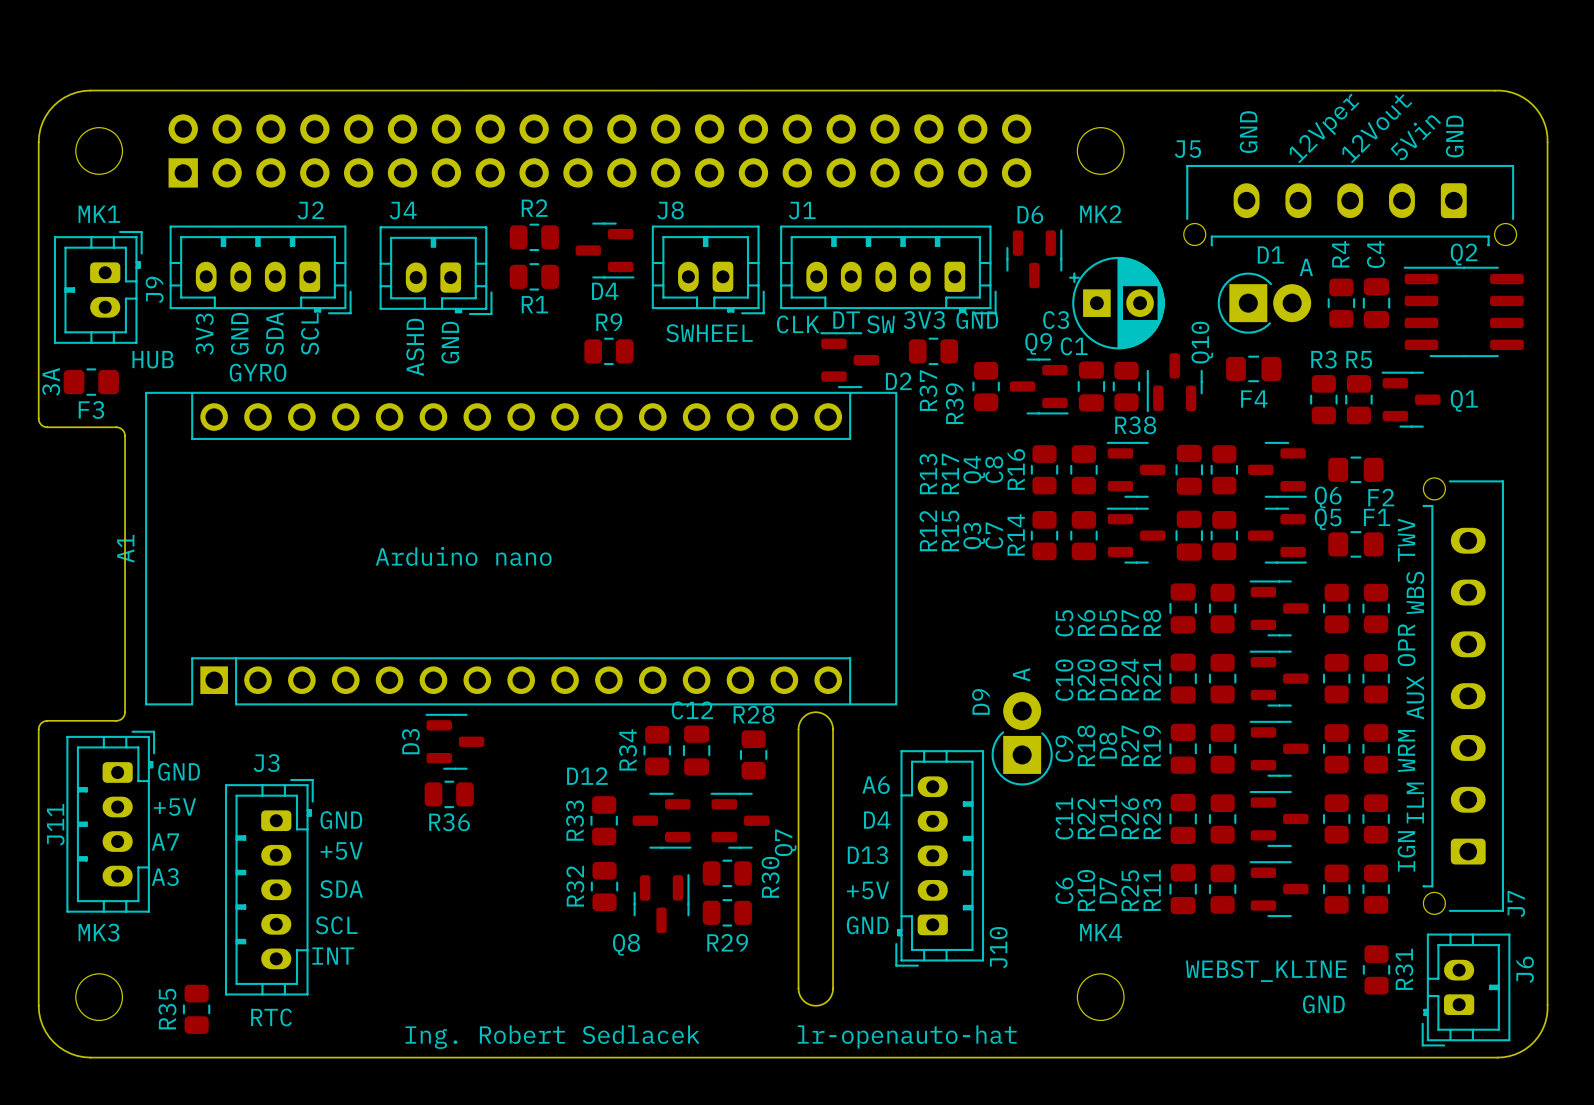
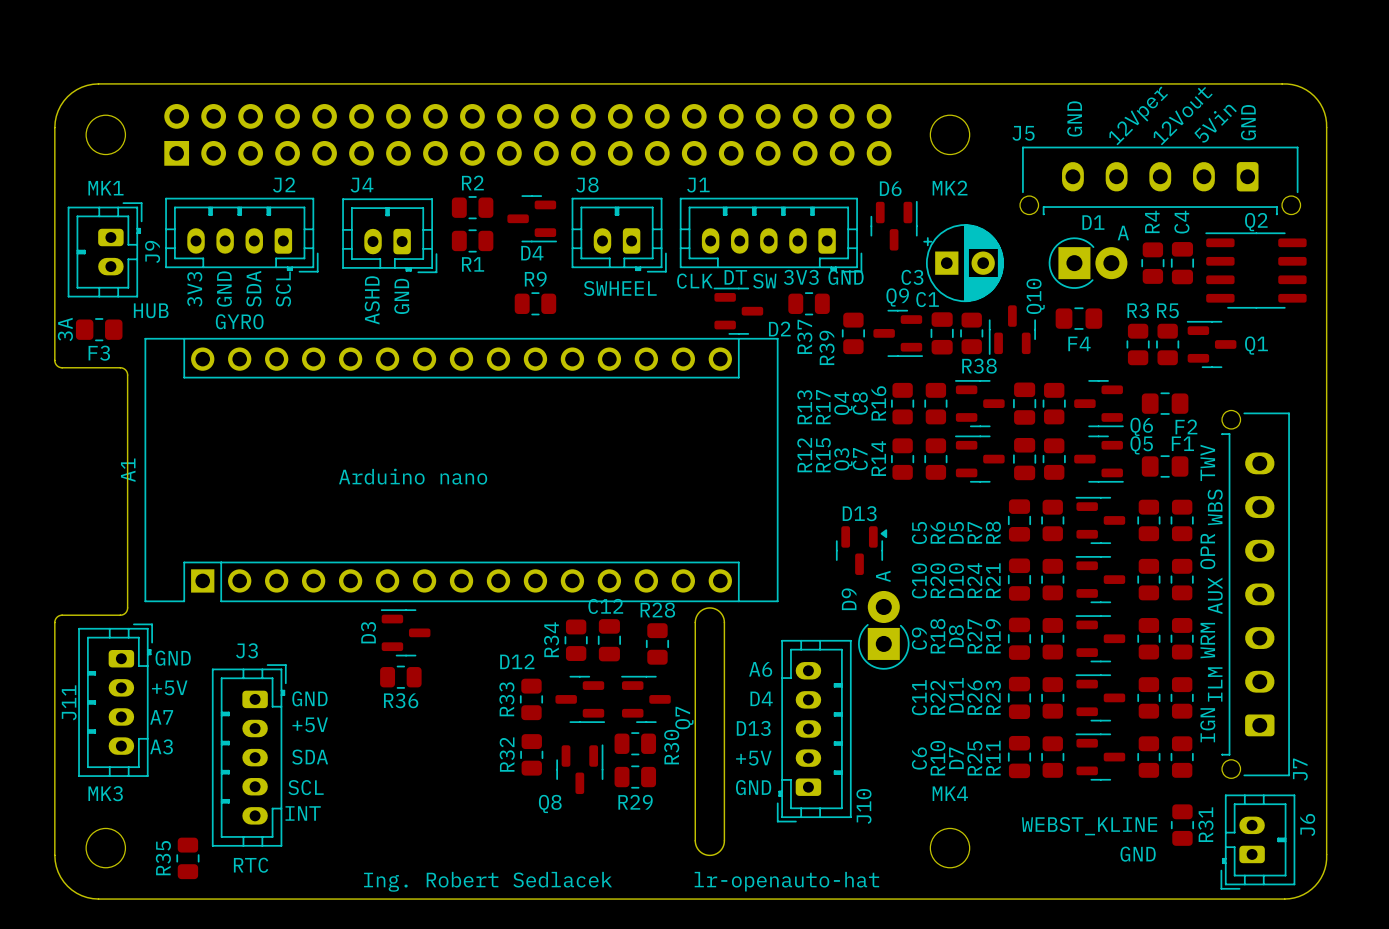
D13: none -> (861, 550)

